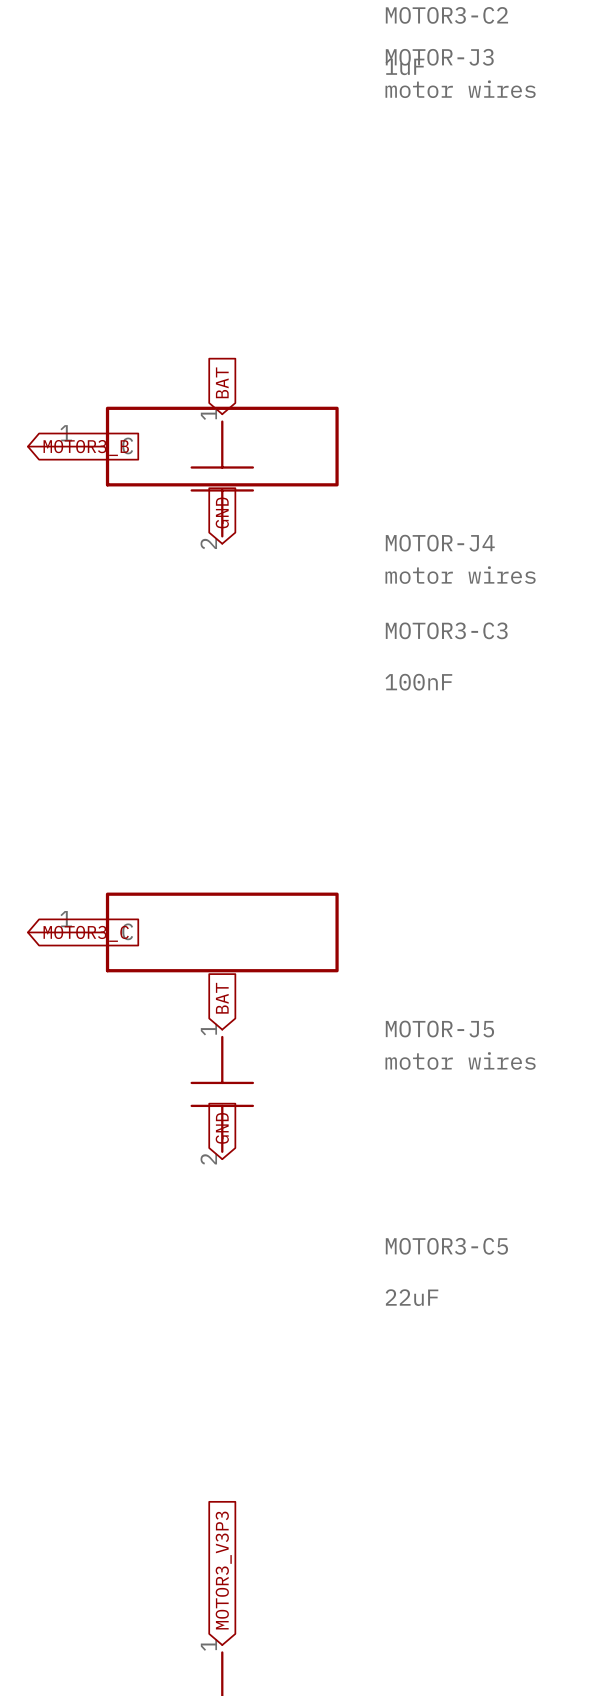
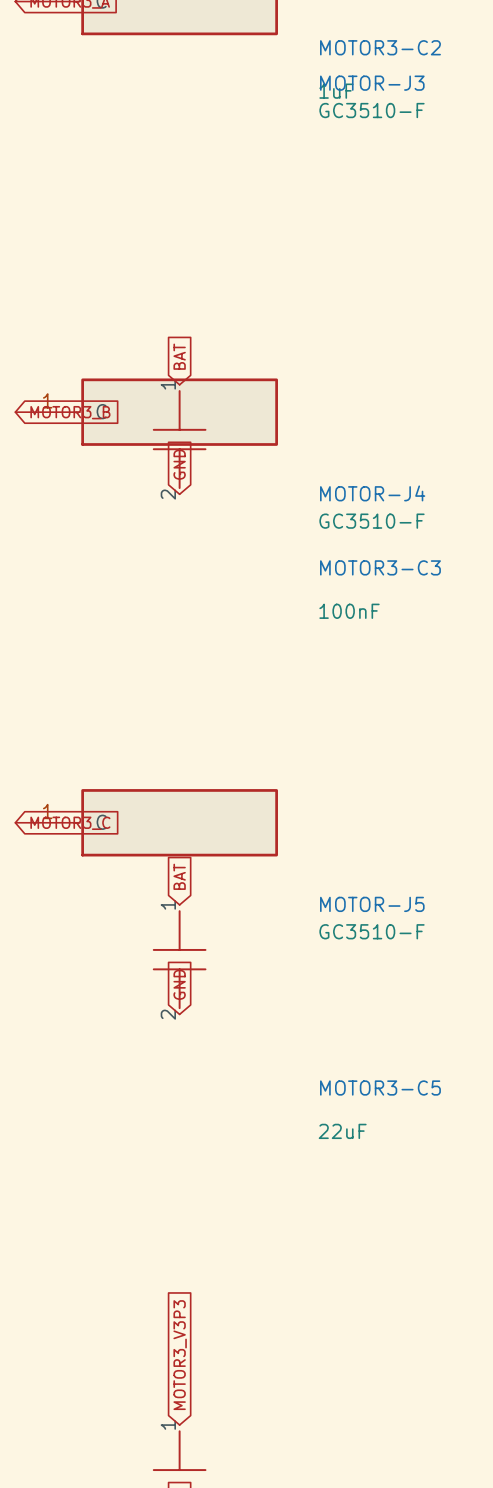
MOTOR-J3 value: motor wires (460, 89) -> GC3510-F (371, 110)
MOTOR-J4 value: motor wires (460, 575) -> GC3510-F (371, 521)
MOTOR-J5 value: motor wires (460, 1060) -> GC3510-F (371, 931)

